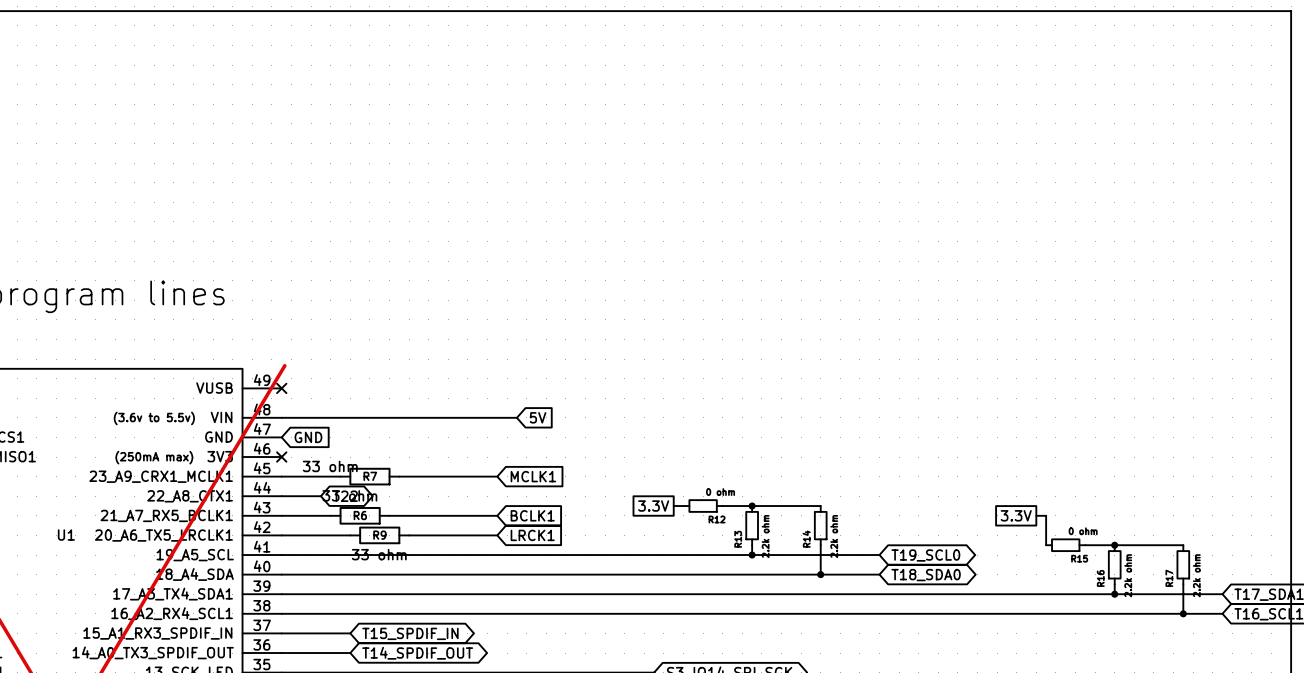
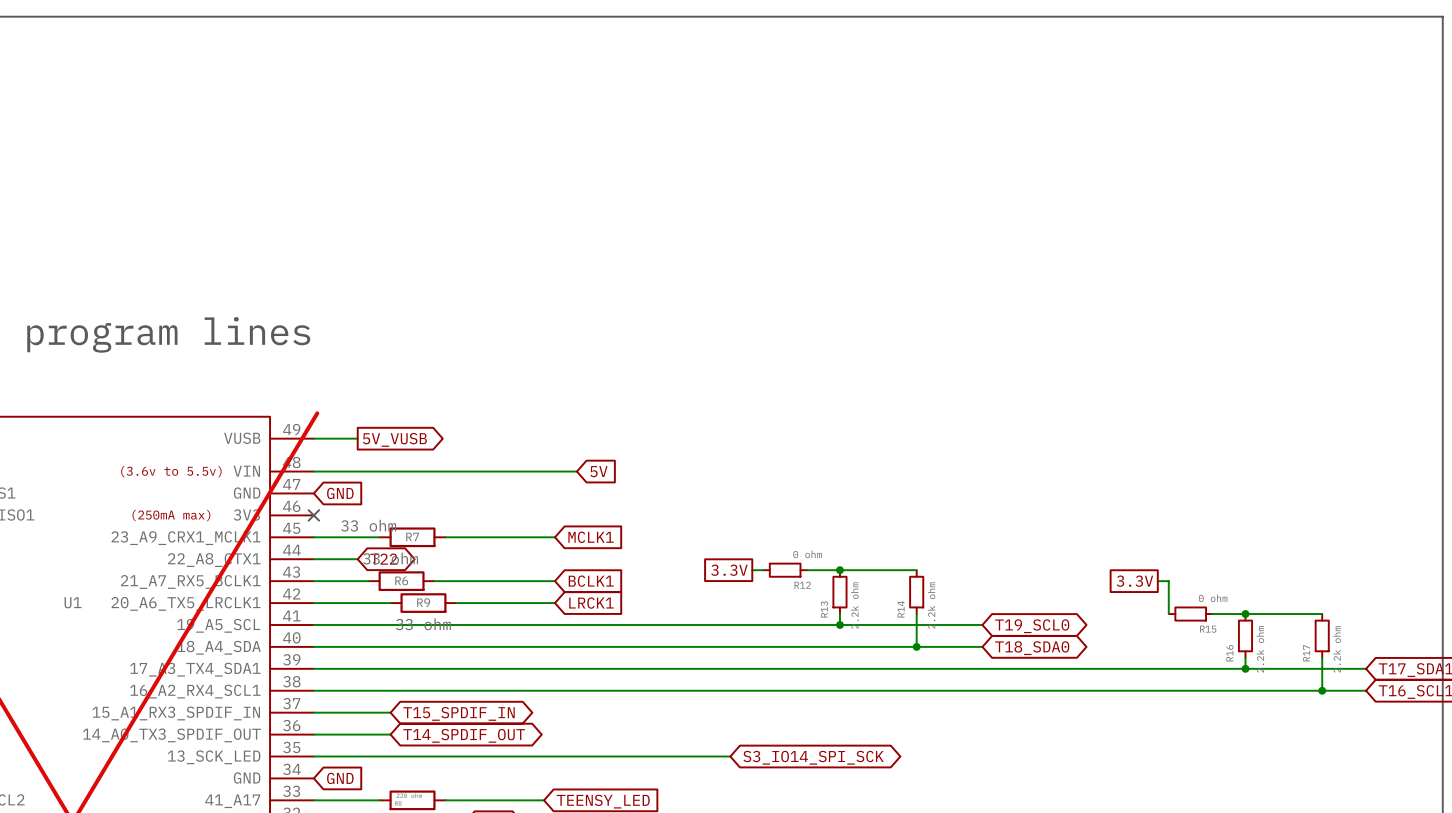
wire: none -> (313, 438) (357, 438)
no-connect mark: (281, 388) -> none
global label: none -> 5V_VUSB (394, 439)

